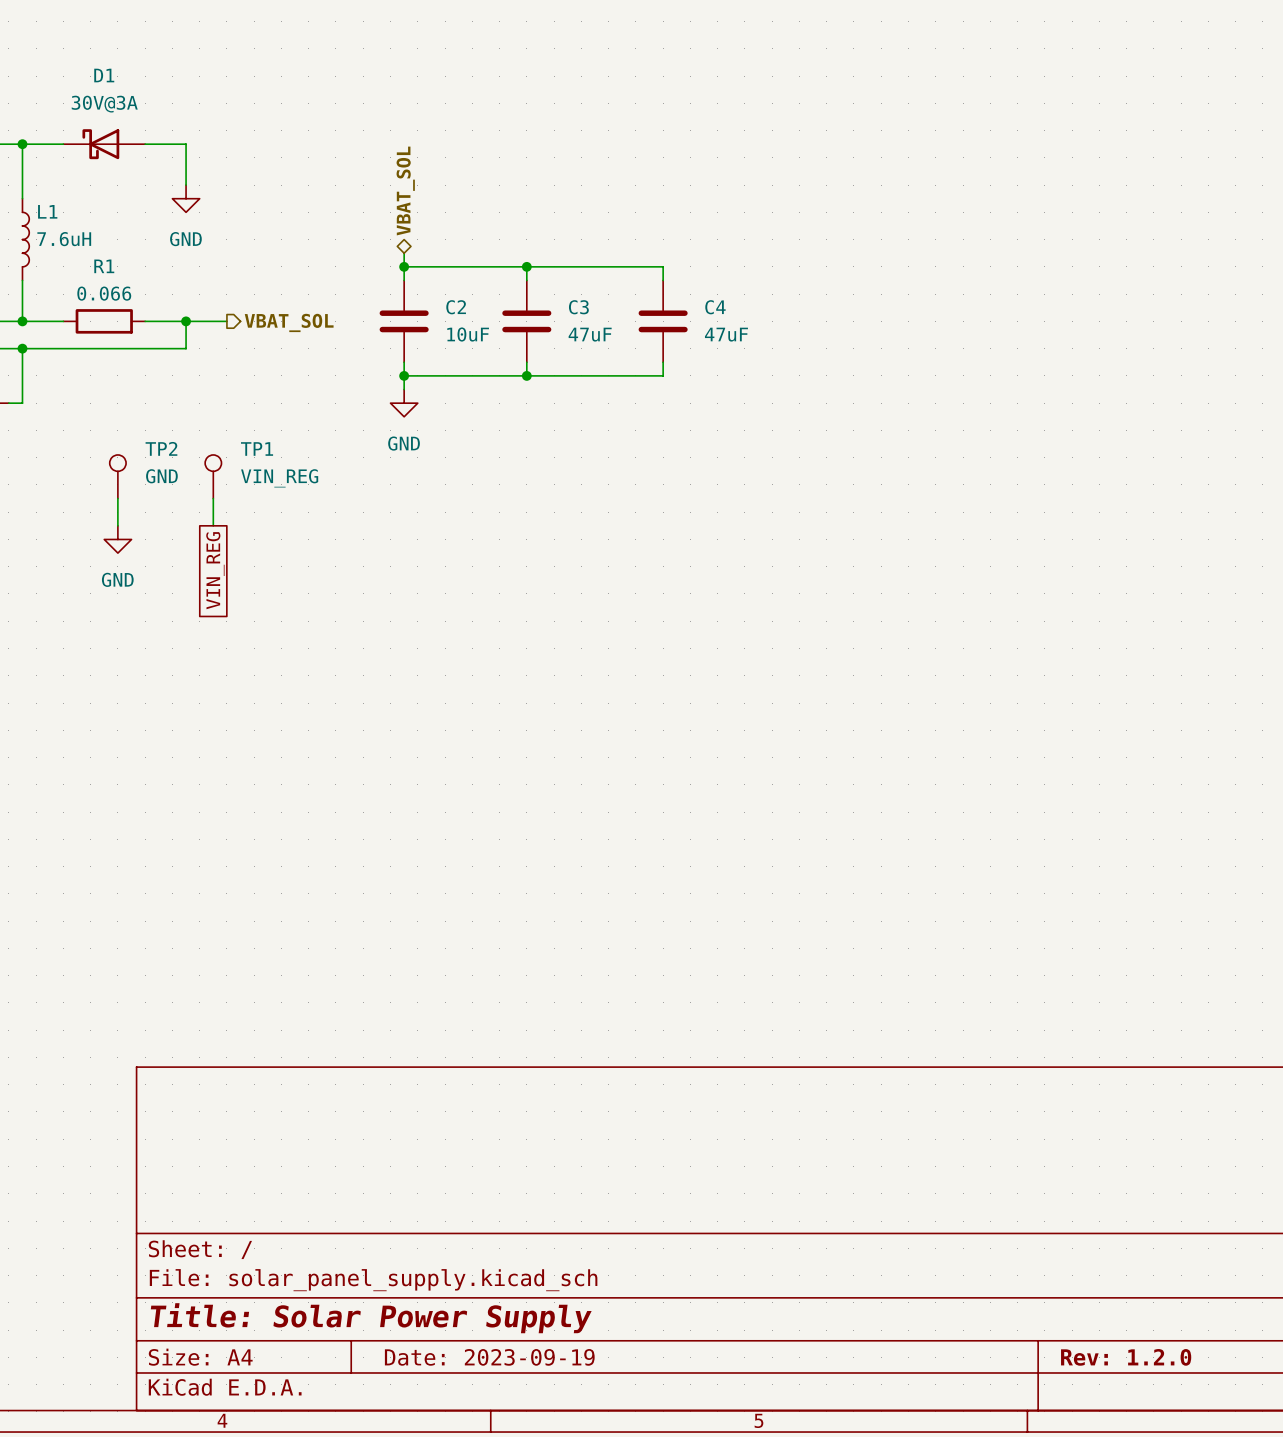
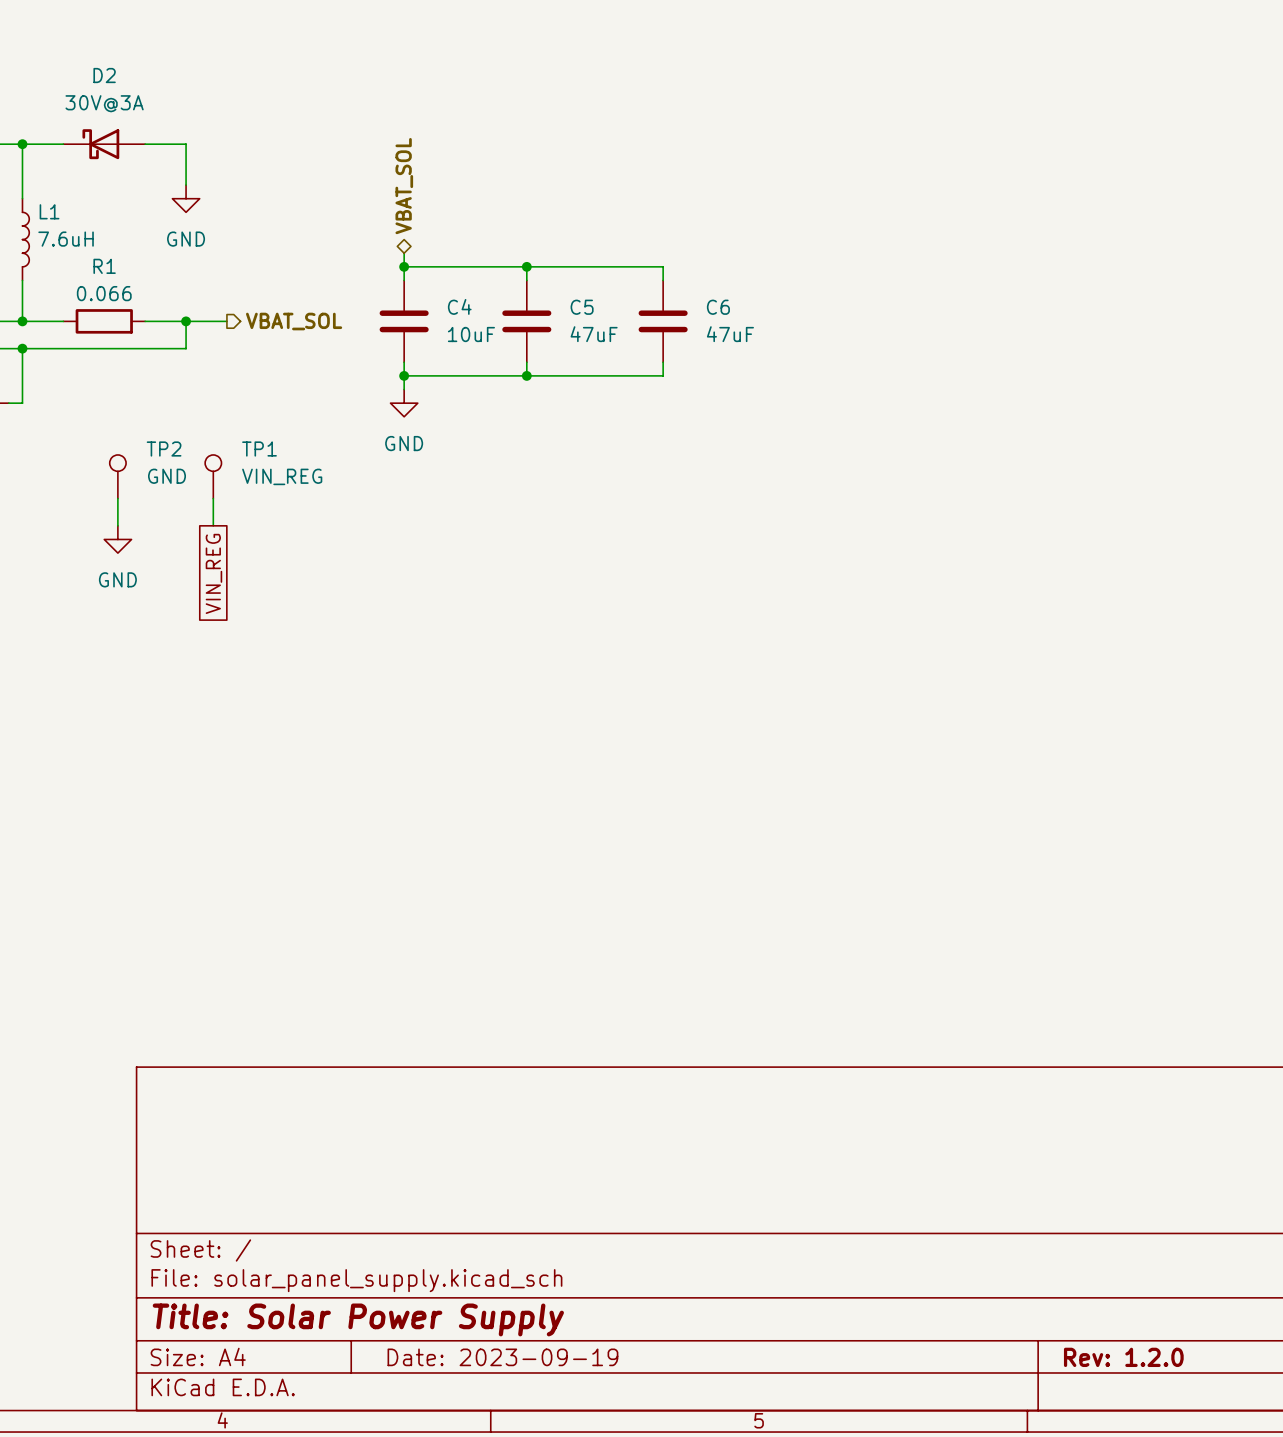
D1 name: D1 (104, 75) -> D2 (104, 75)
C2 name: C2 (456, 307) -> C4 (459, 306)
C3 name: C3 (578, 307) -> C5 (582, 307)
C4 name: C4 (715, 307) -> C6 (718, 307)

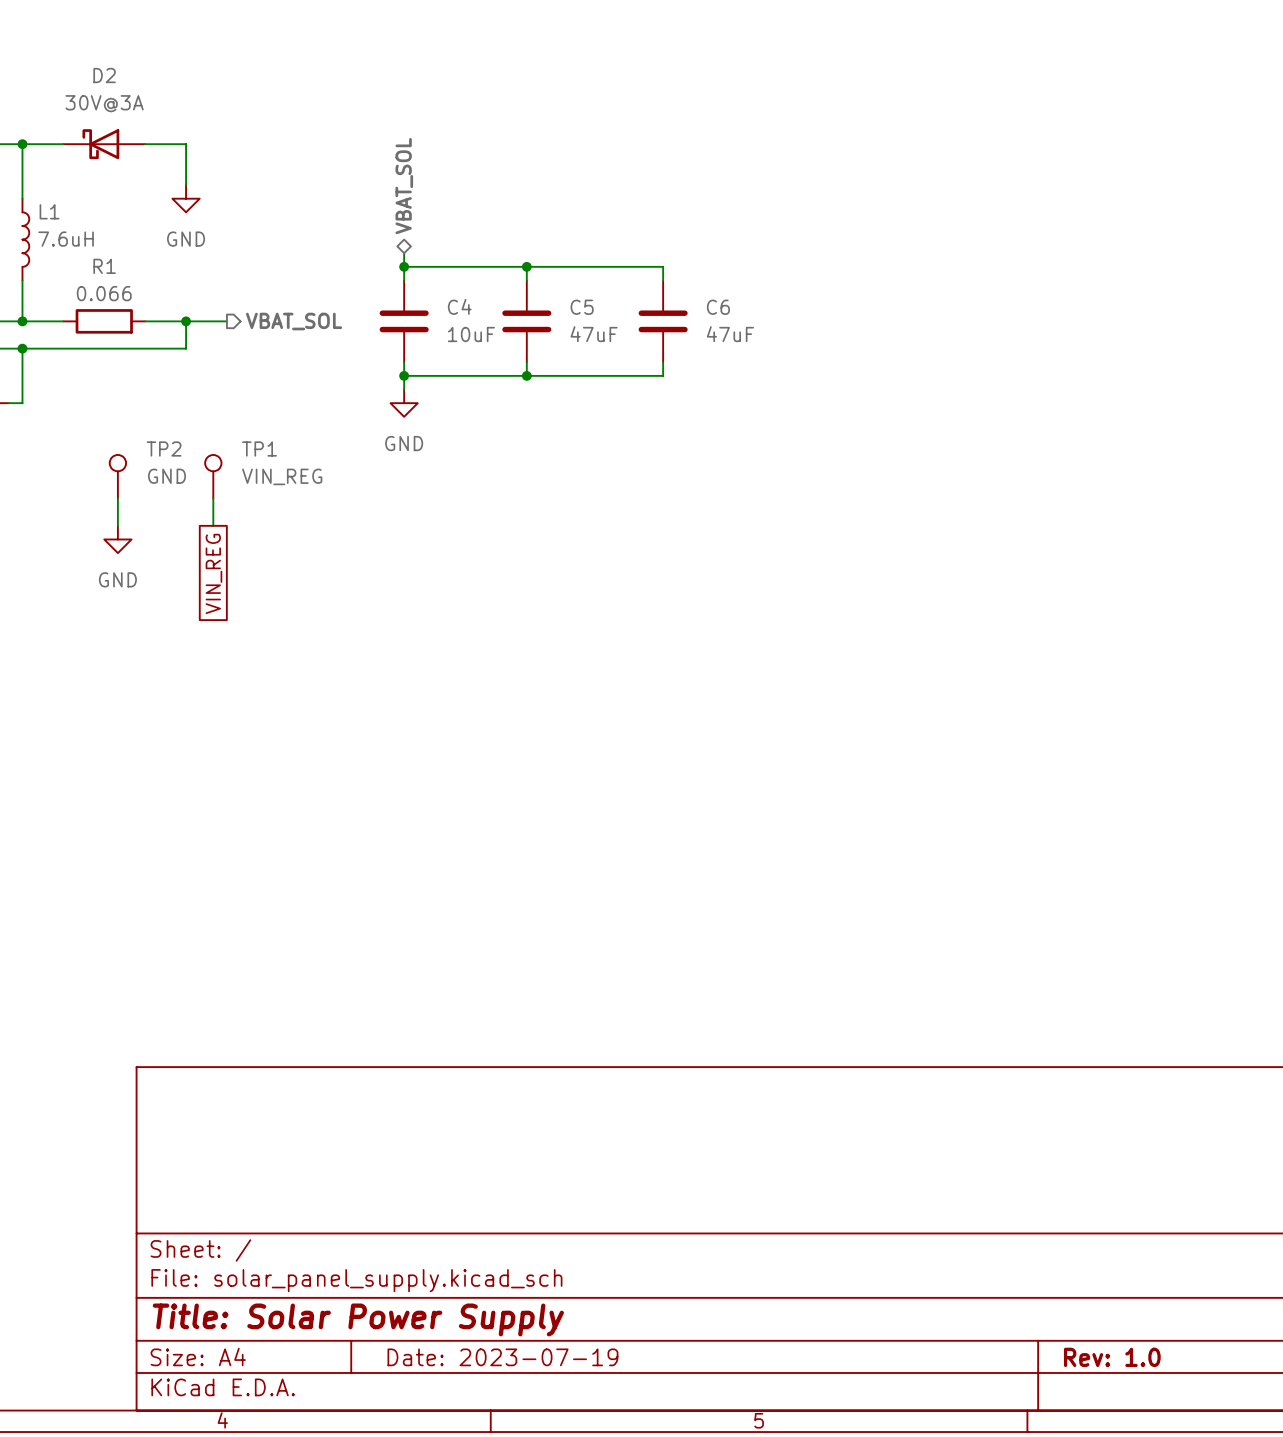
title block: Date: 2023-09-19 (502, 1357) -> Date: 2023-07-19 (502, 1357)
title block: Rev: 1.2.0 (1123, 1357) -> Rev: 1.0 (1112, 1357)

